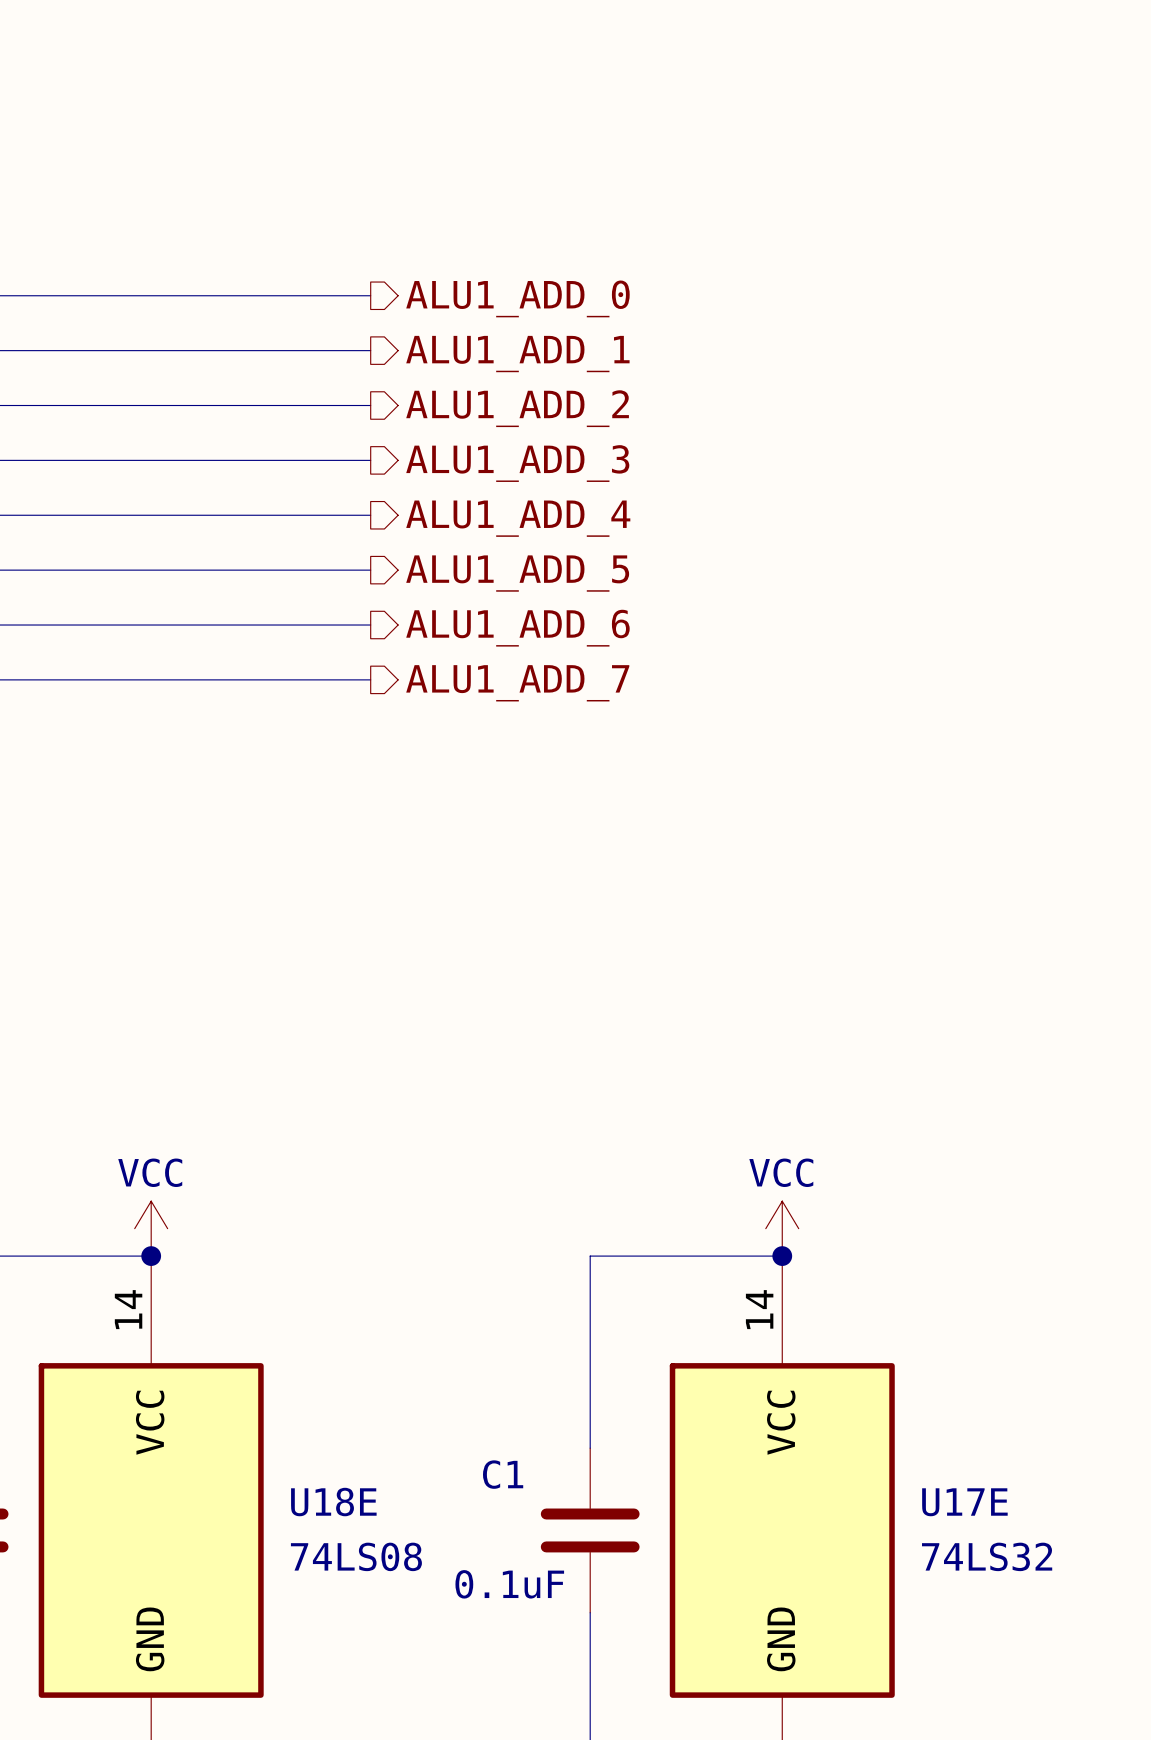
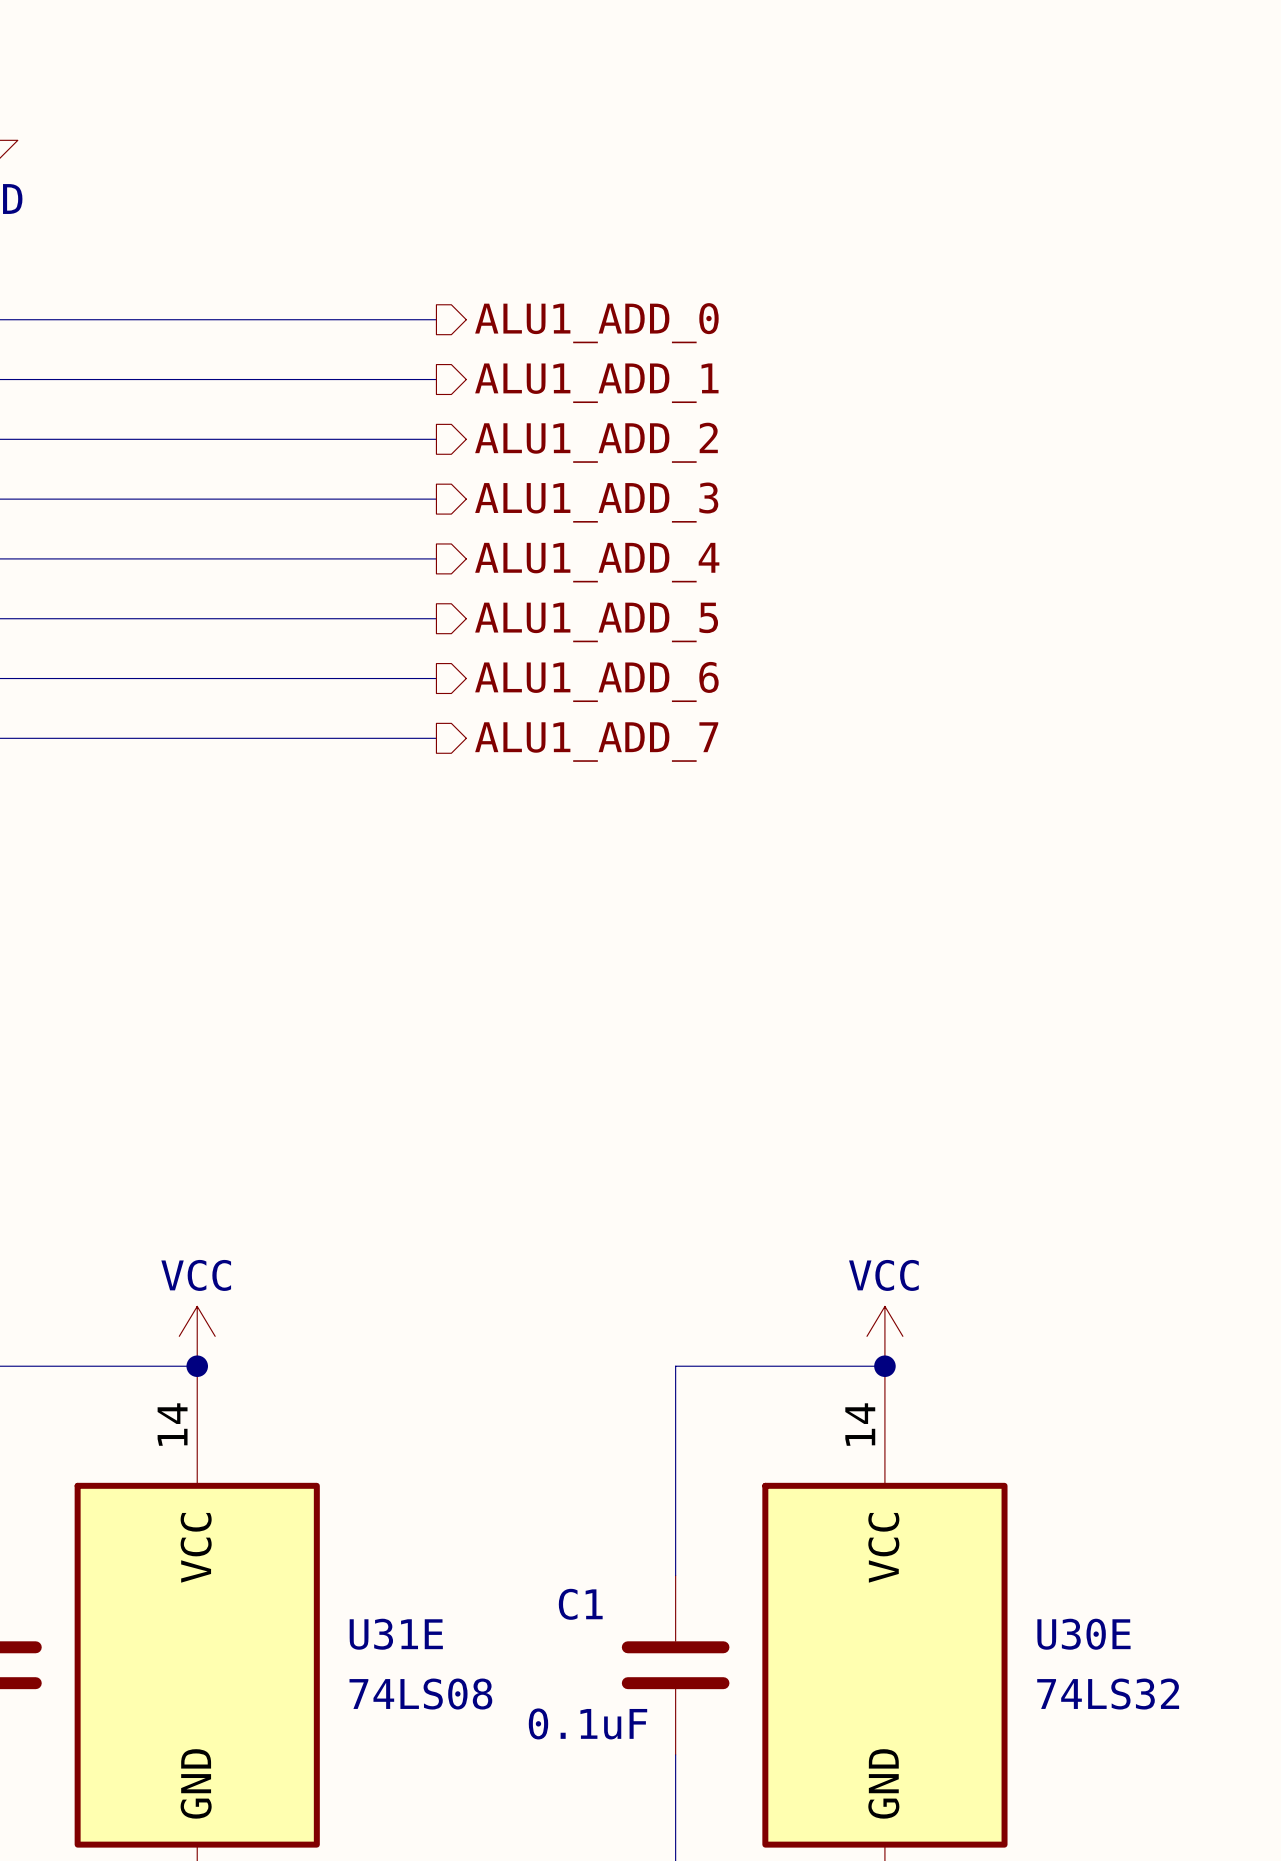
U18E name: U18E (333, 1502) -> U31E (396, 1634)
U17E name: U17E (964, 1502) -> U30E (1083, 1634)

